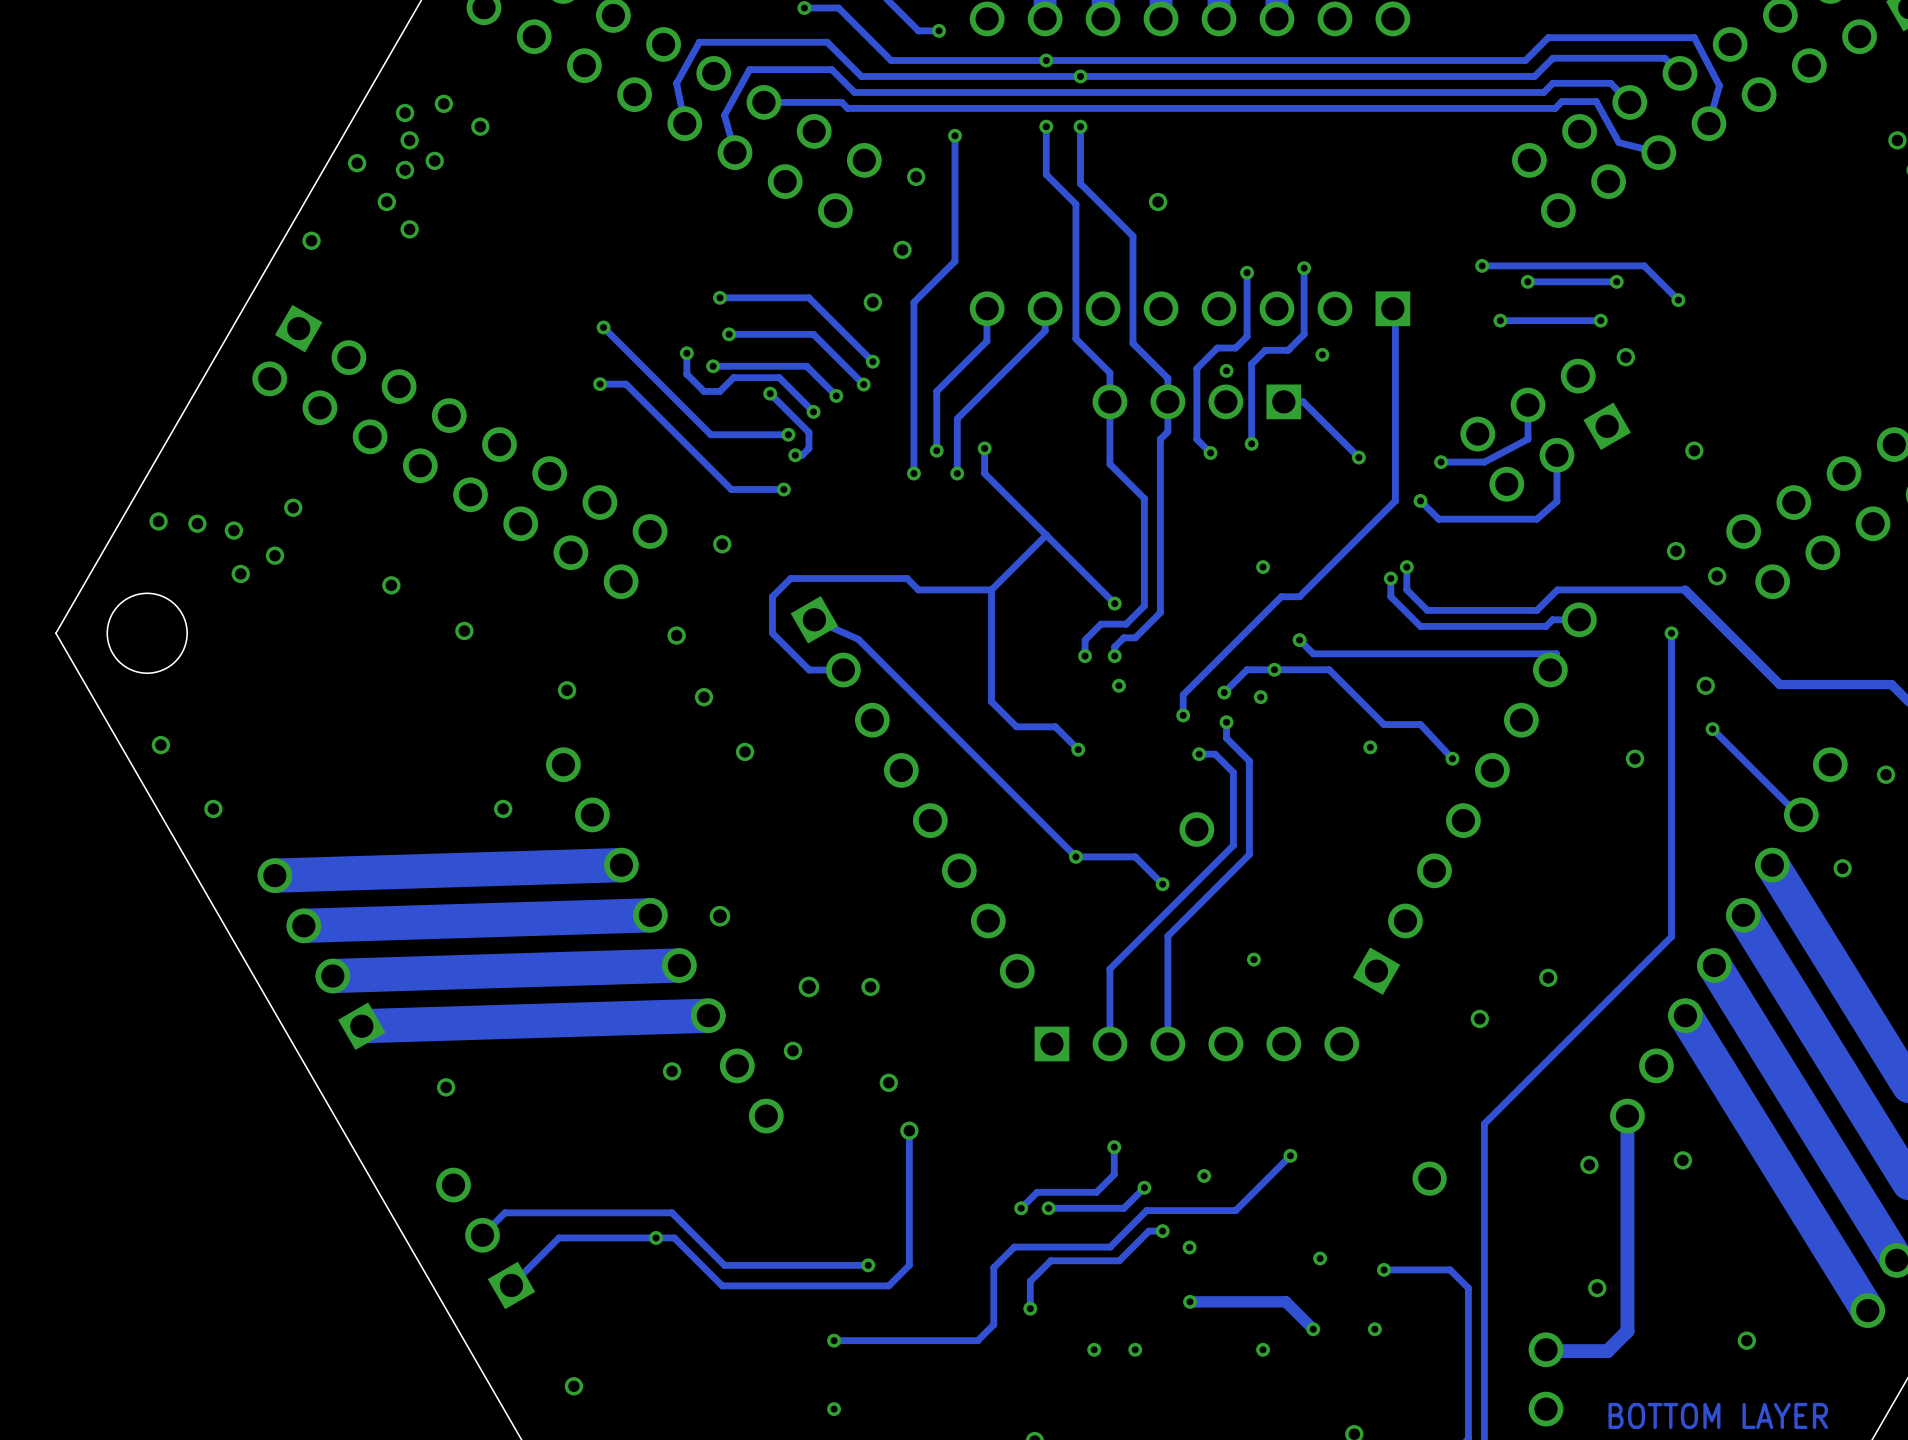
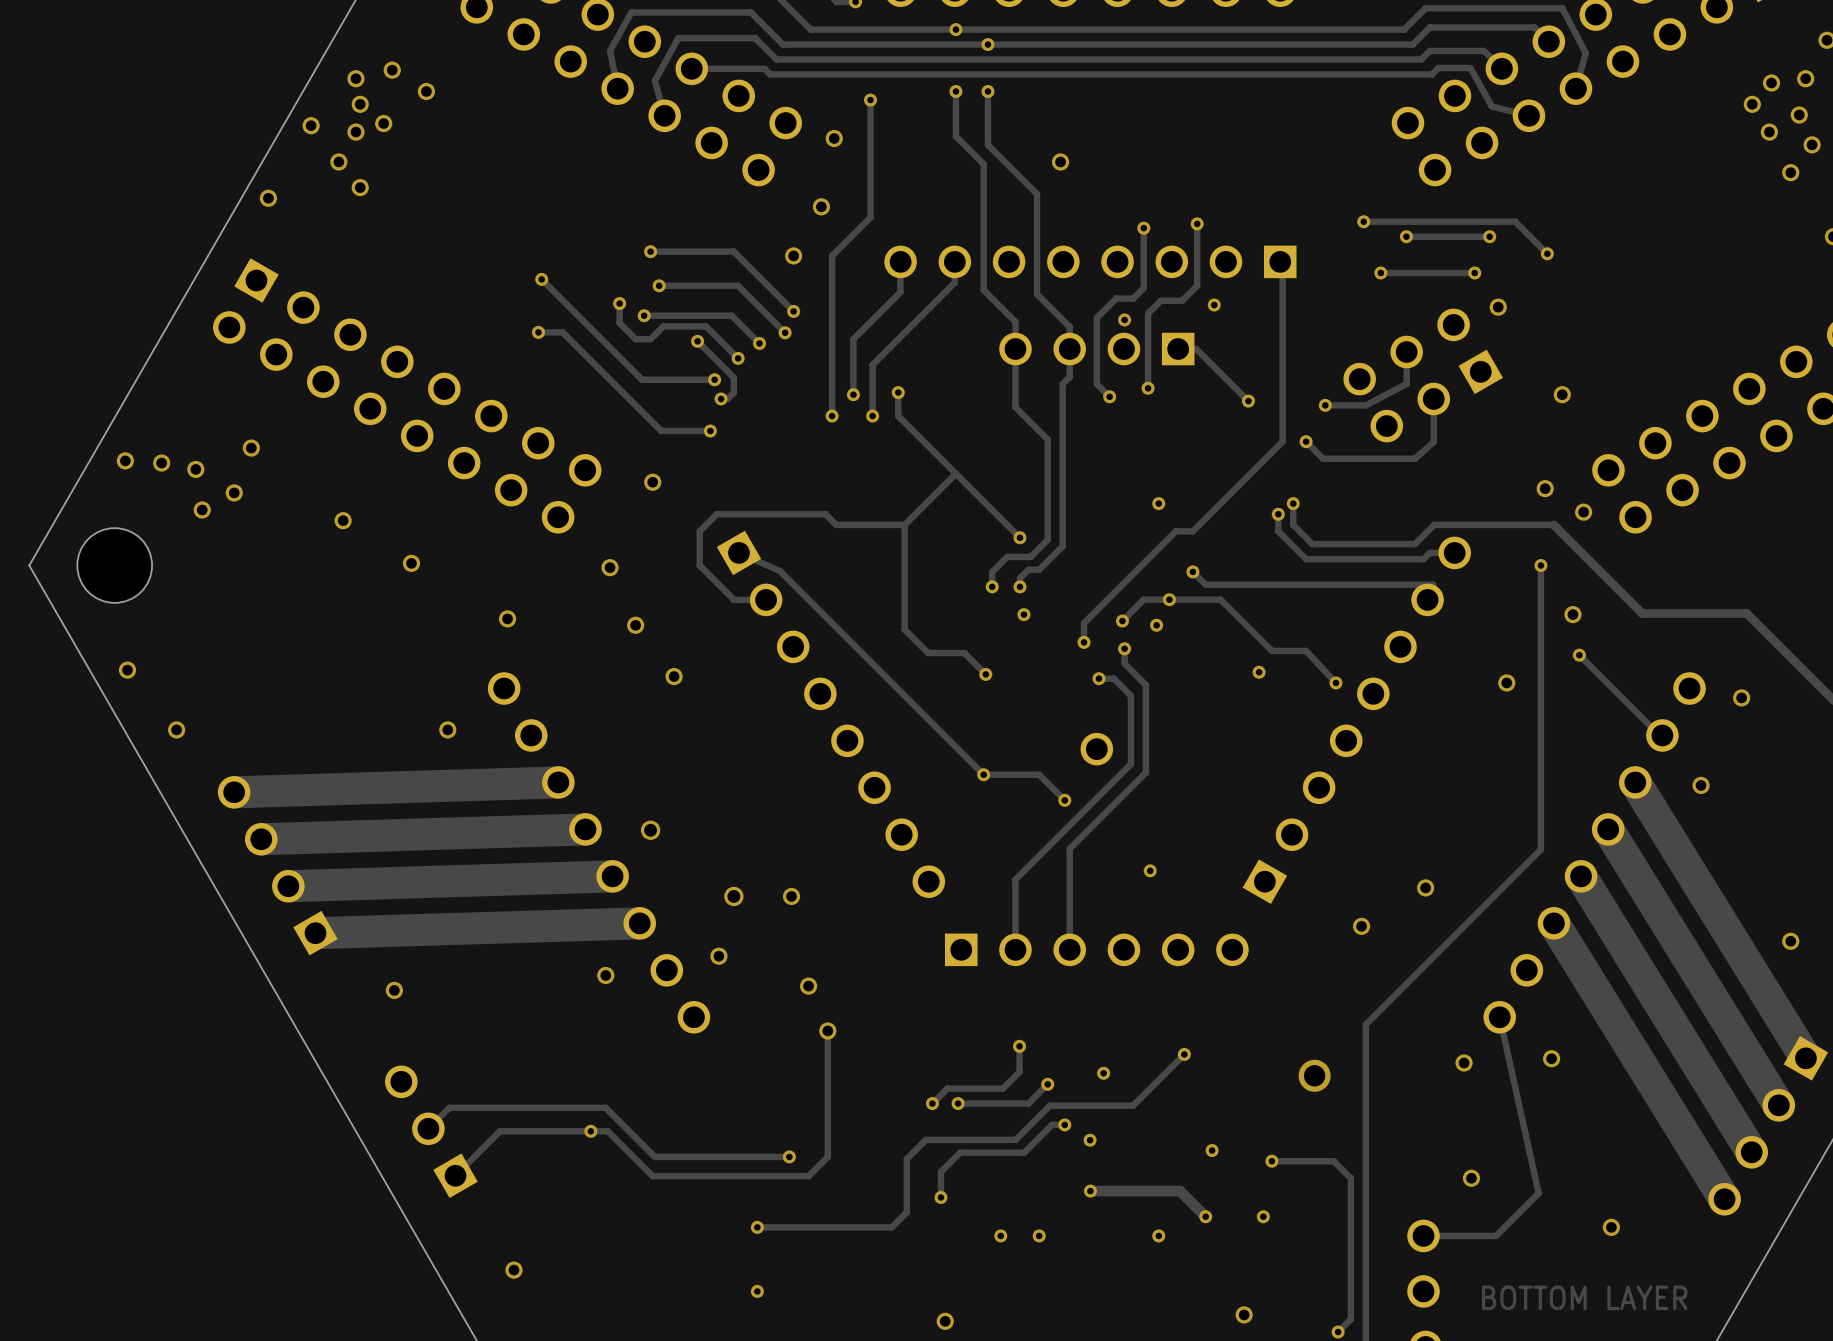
track: (1627, 1116) (1627, 1331) (1607, 1351) (1546, 1349) -> (1499, 1017) (1538, 1193) (1496, 1235) (1423, 1235)

